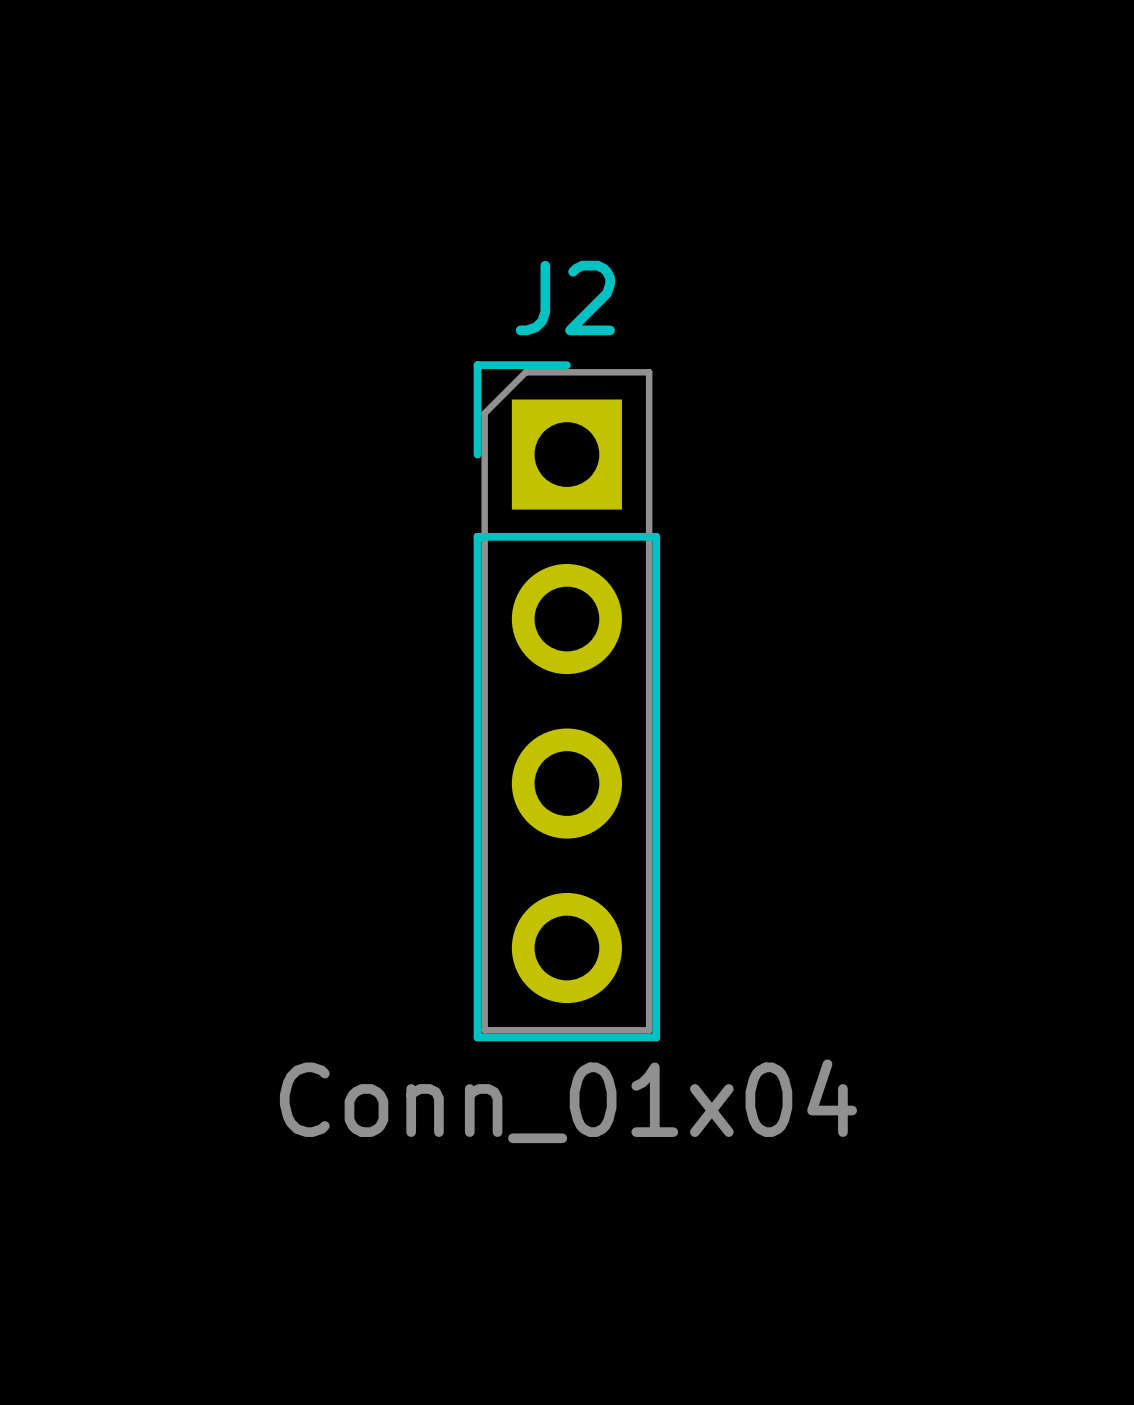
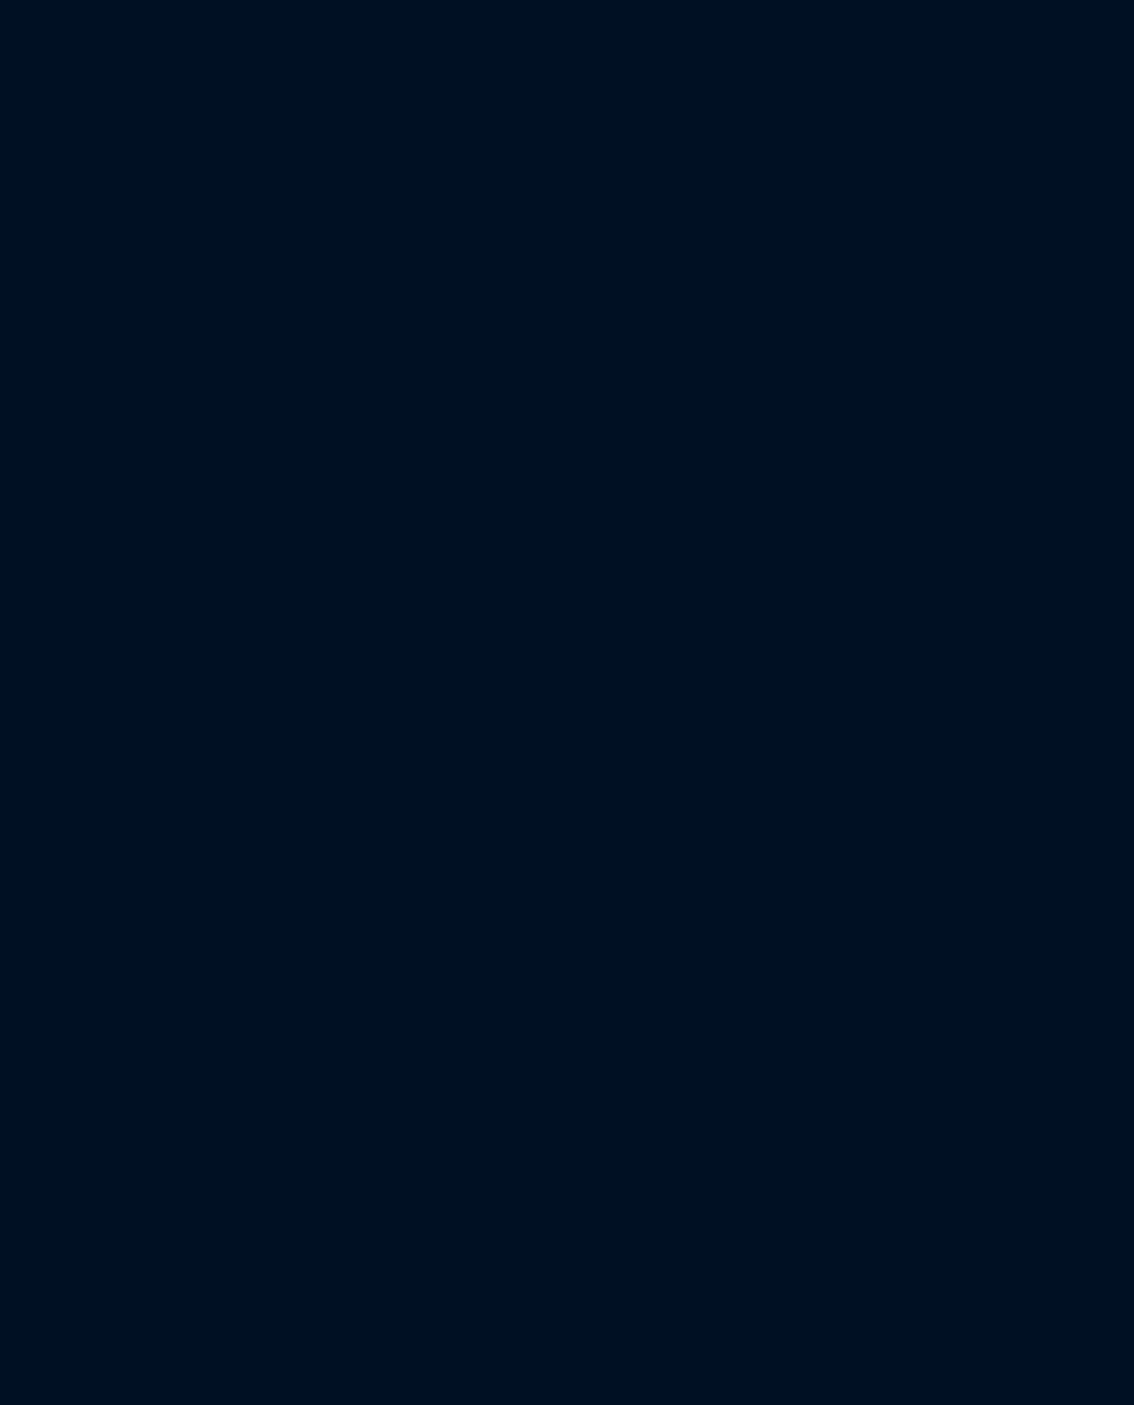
J2: Conn_01x04 (566, 701) -> none

